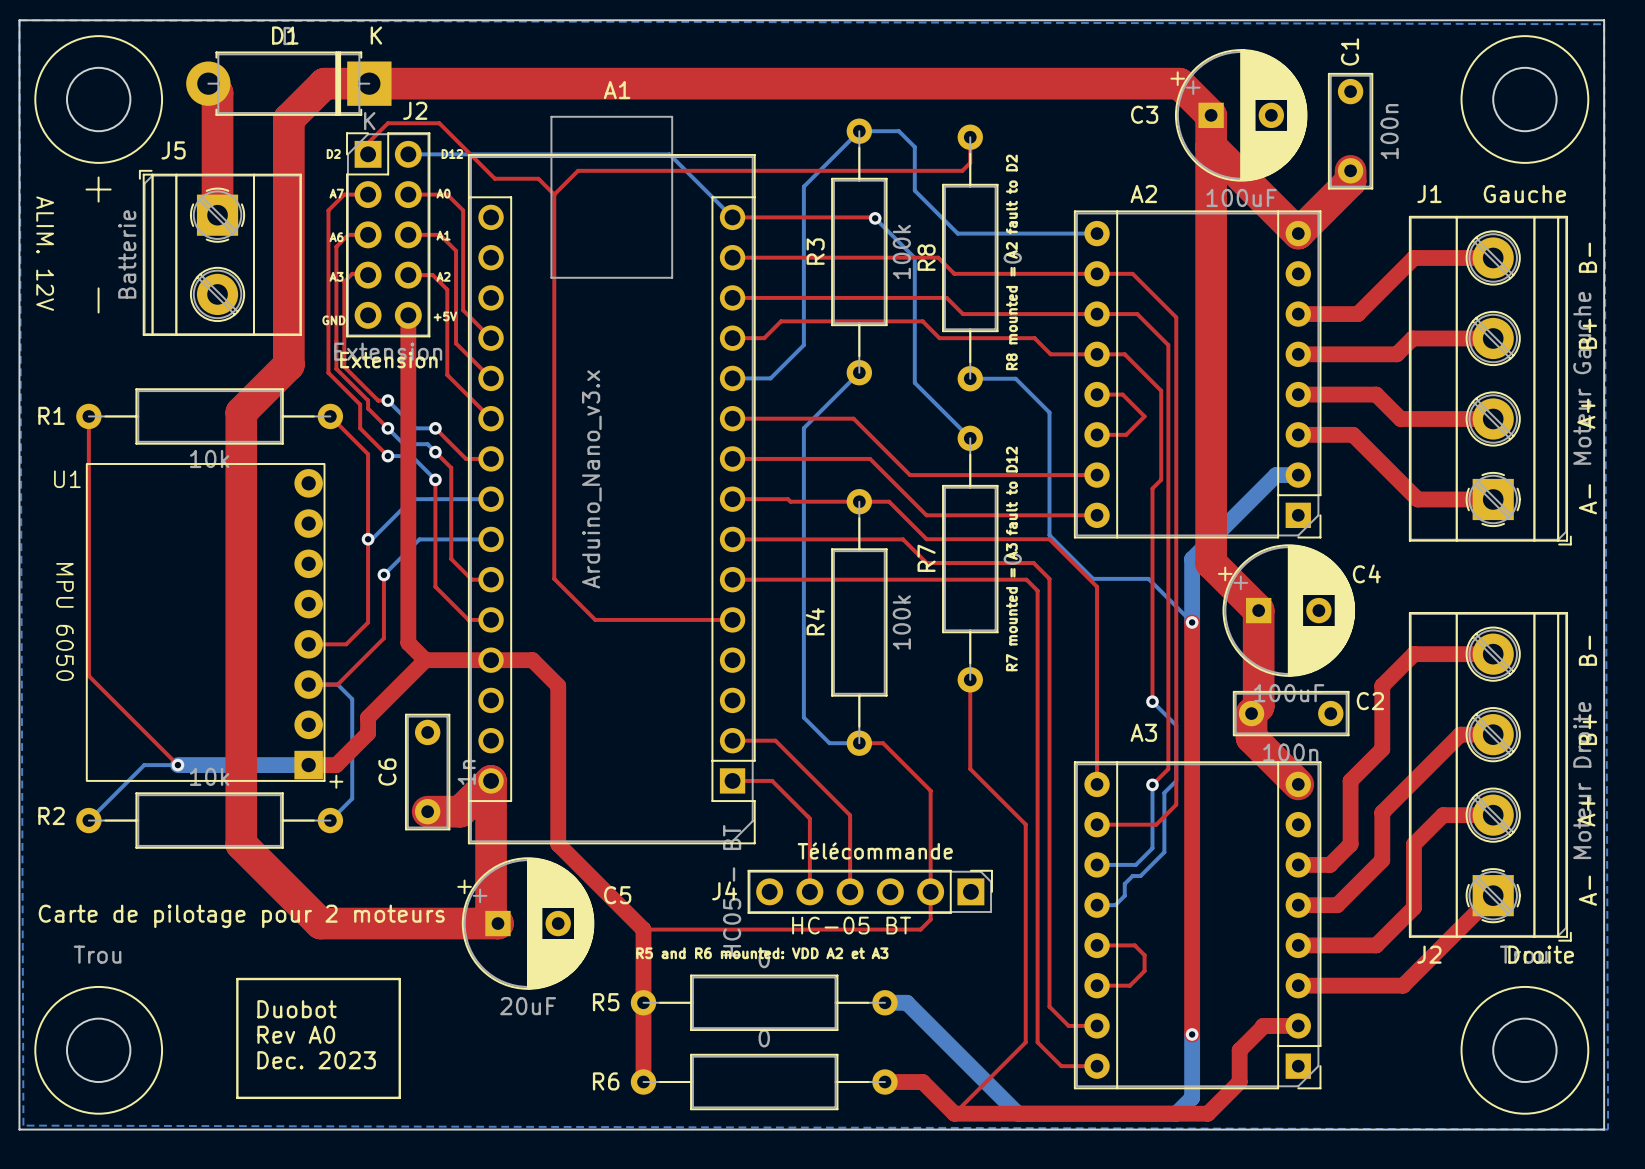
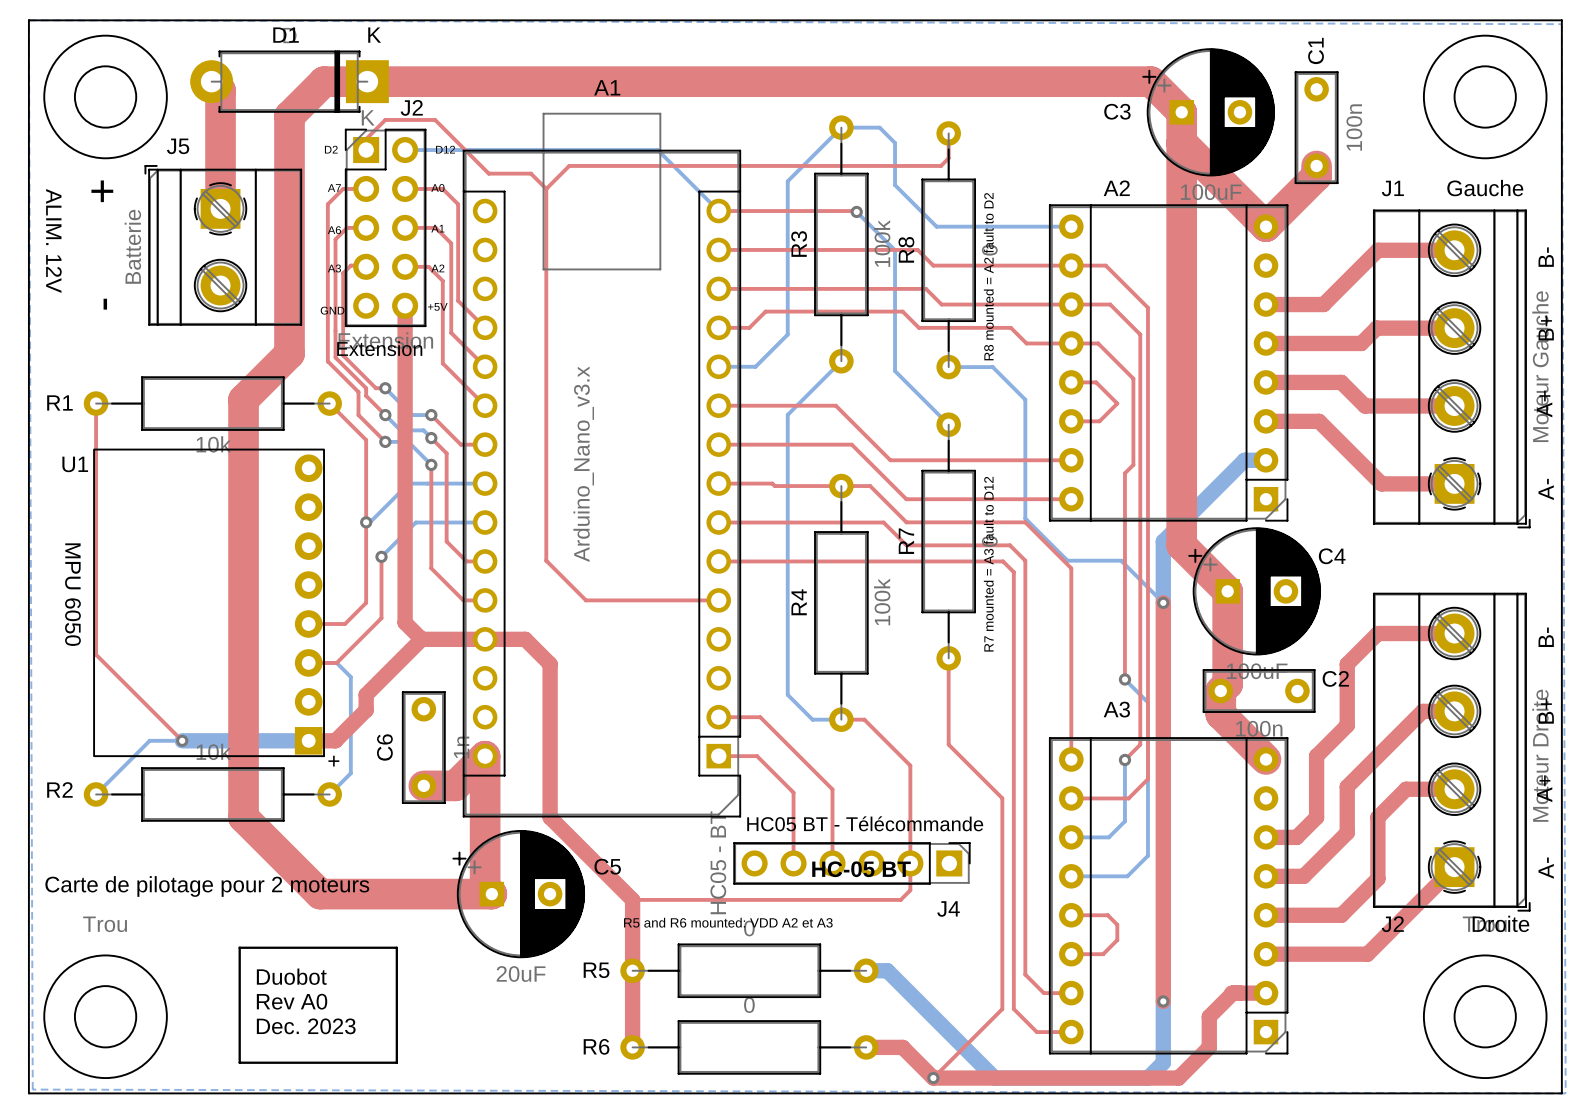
bottom track: (1176, 780) (1164, 792) (1164, 852) (1140, 876) (1132, 876) (1124, 883) (1124, 895) (1115, 905) -> (1147, 756) (1147, 855) (1127, 876) (1089, 876)
text: Télécommande (875, 850) -> HC05 BT - Télécommande (865, 823)
J4 name position: J4 (724, 890) -> J4 (948, 908)
text position: HC-05 BT (851, 925) -> HC-05 BT (861, 869)
via: none -> (933, 1078)

